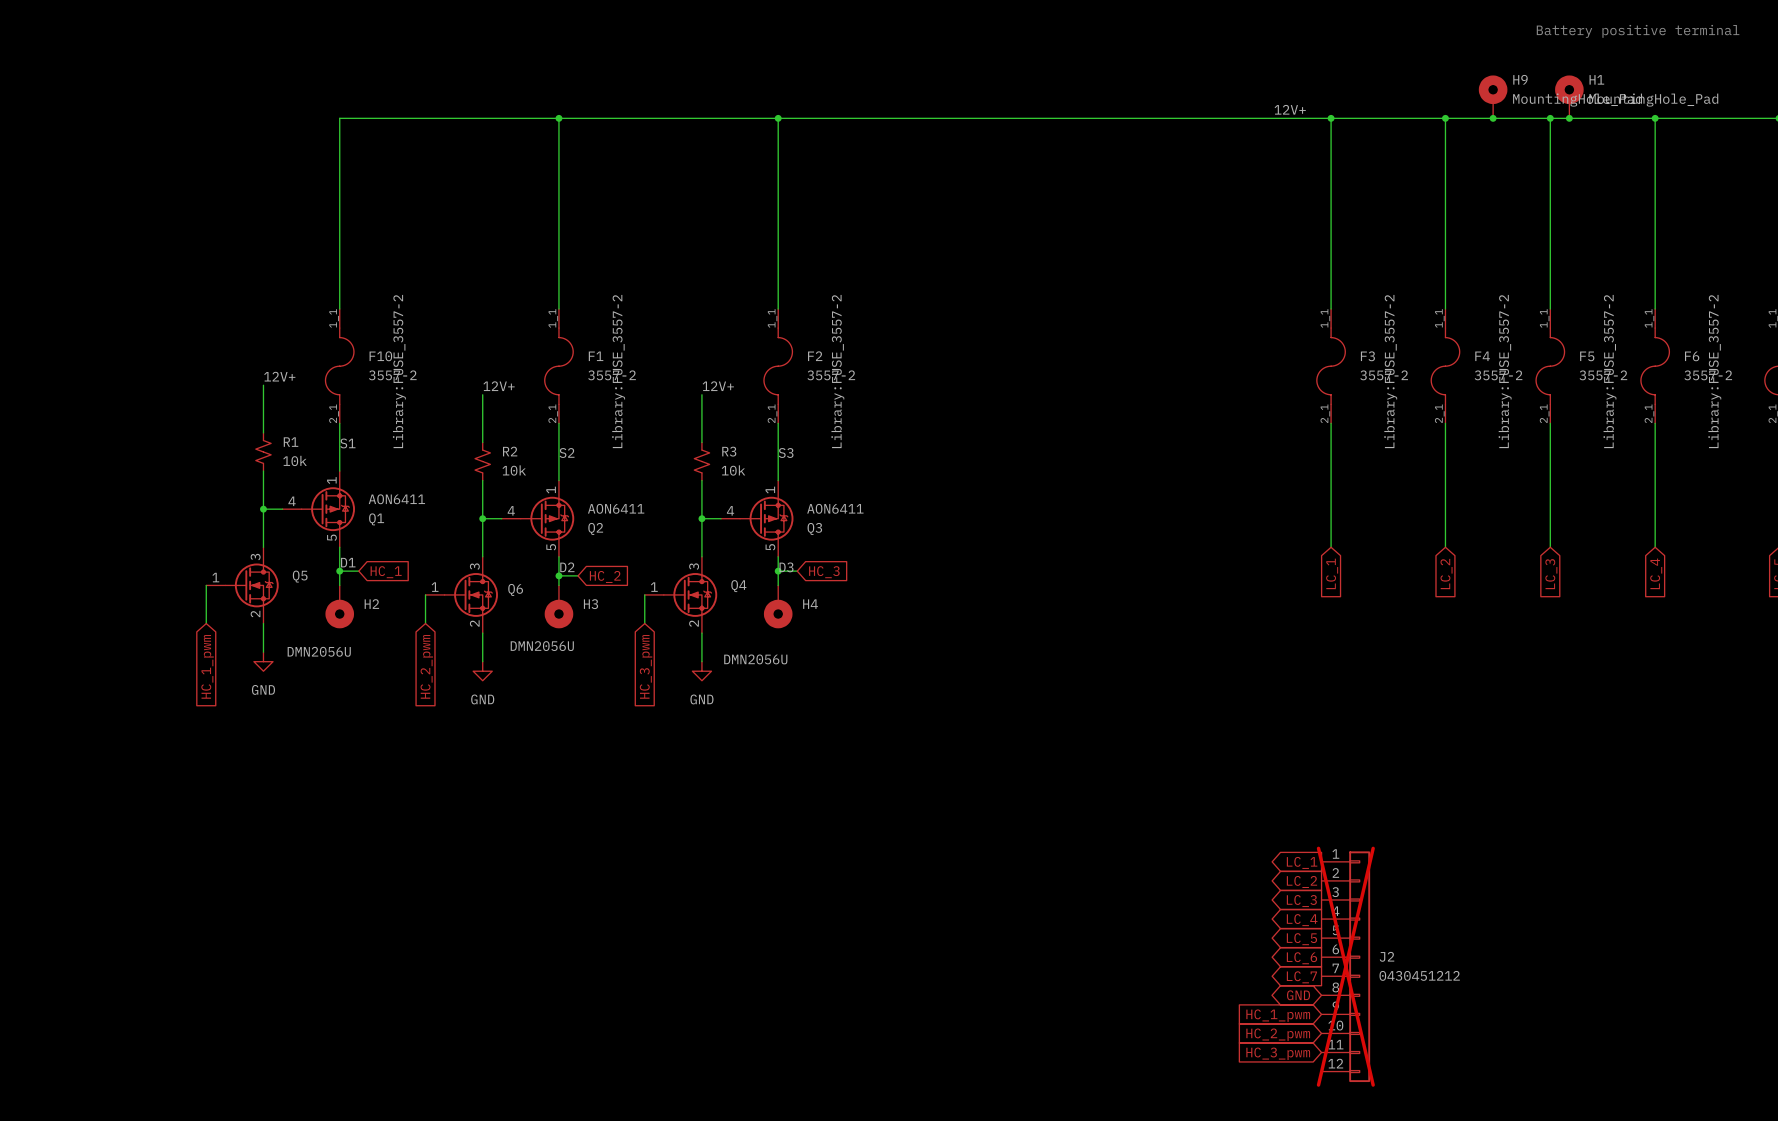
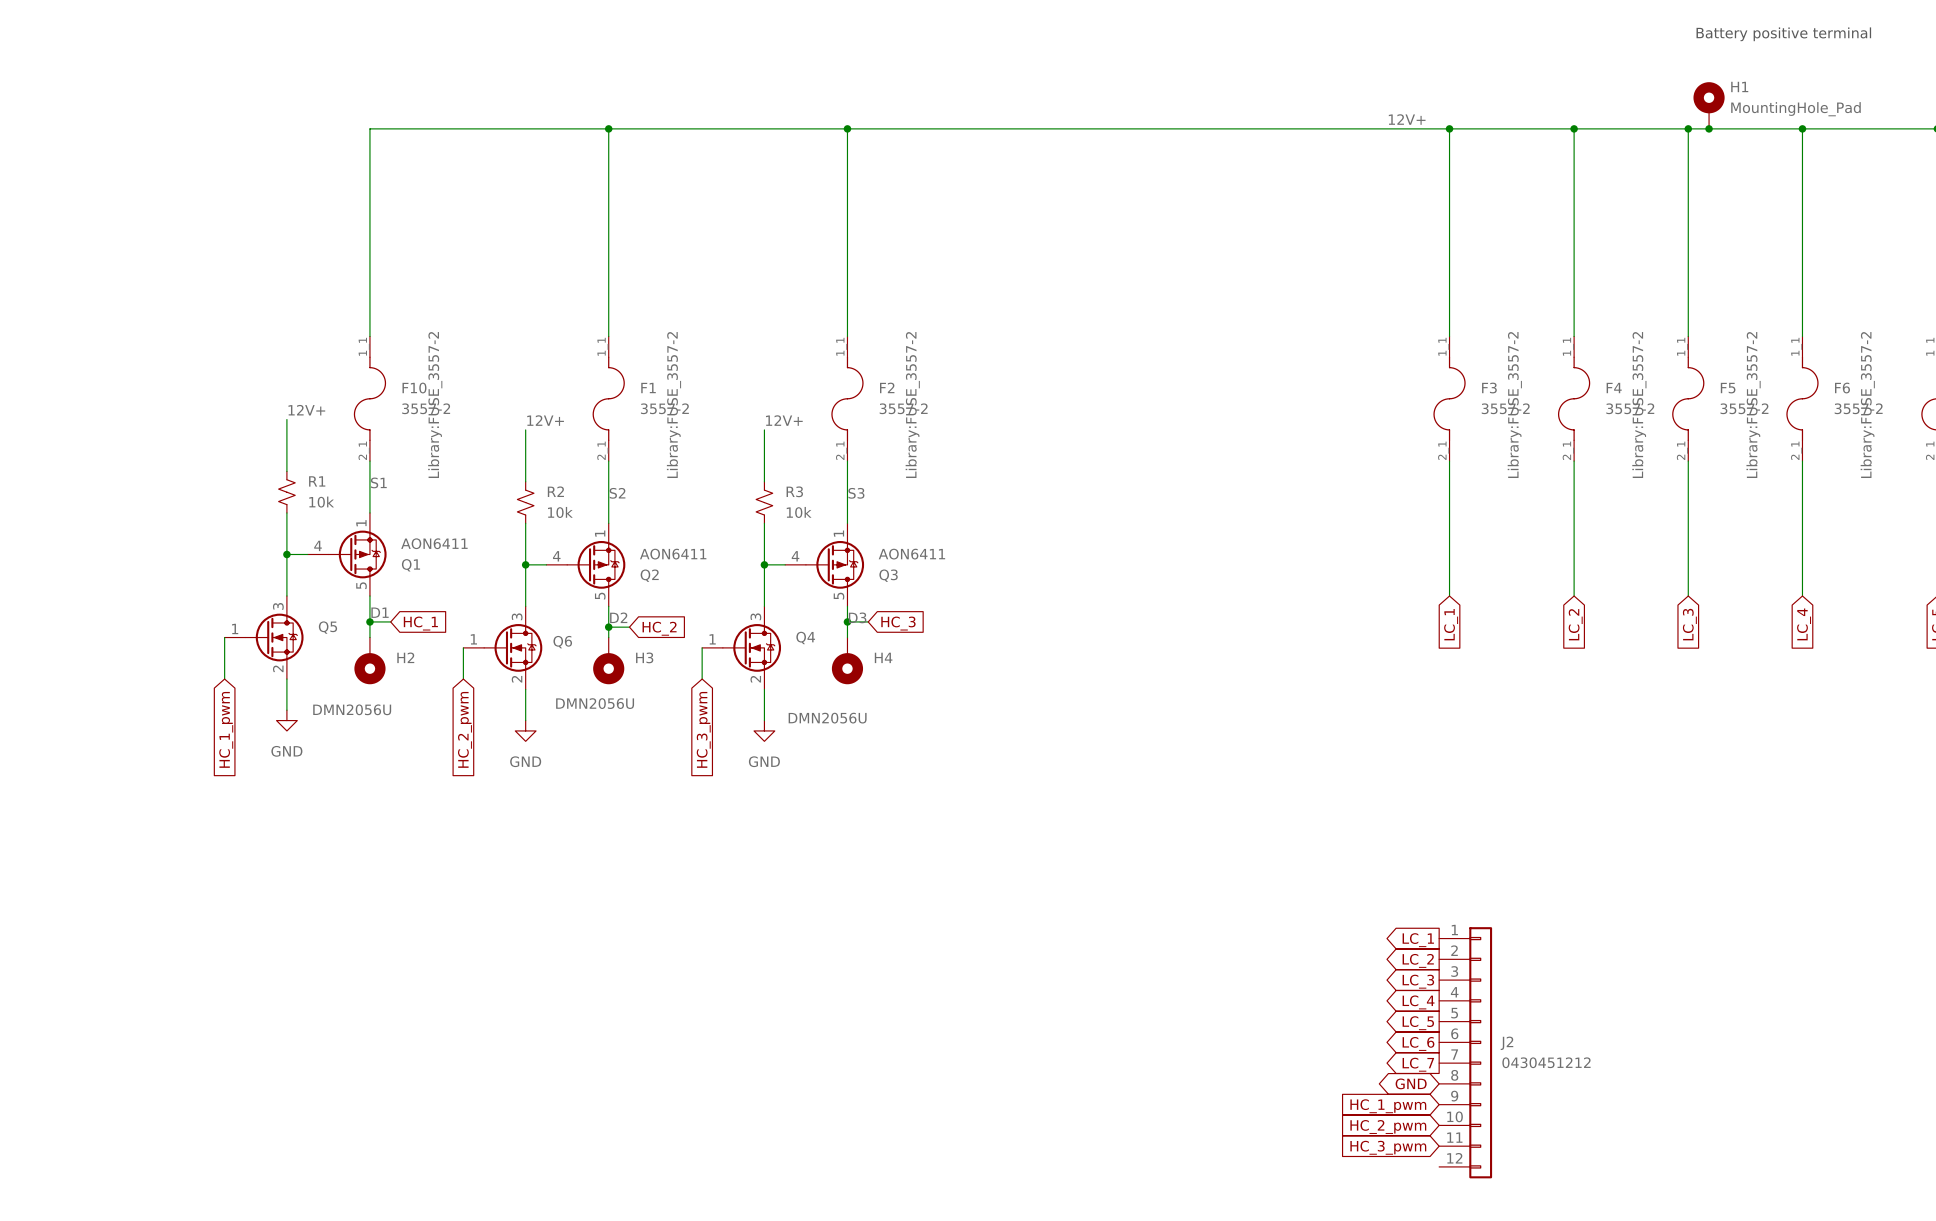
H9: MountingHole_Pad (1493, 96) -> none
junction: (1493, 118) -> none
J2 do-not-place cross: (1345, 966) -> none

